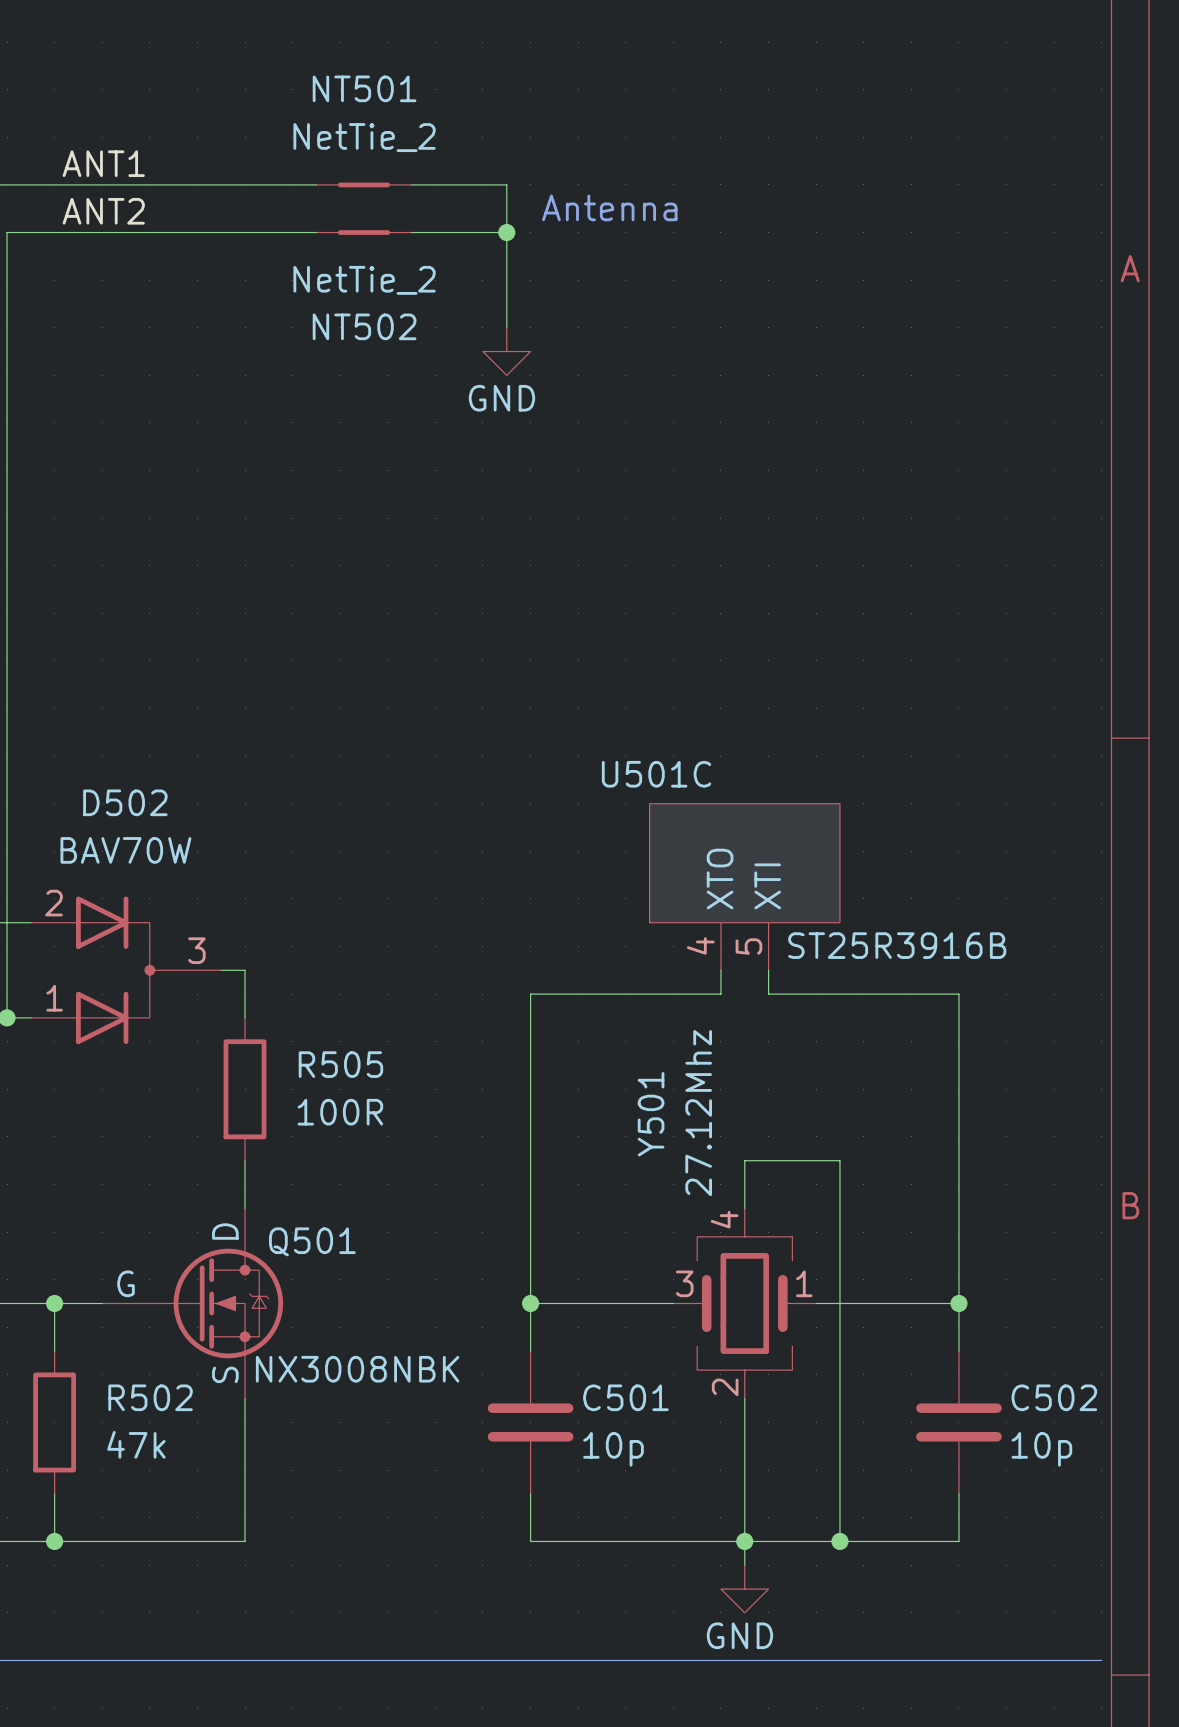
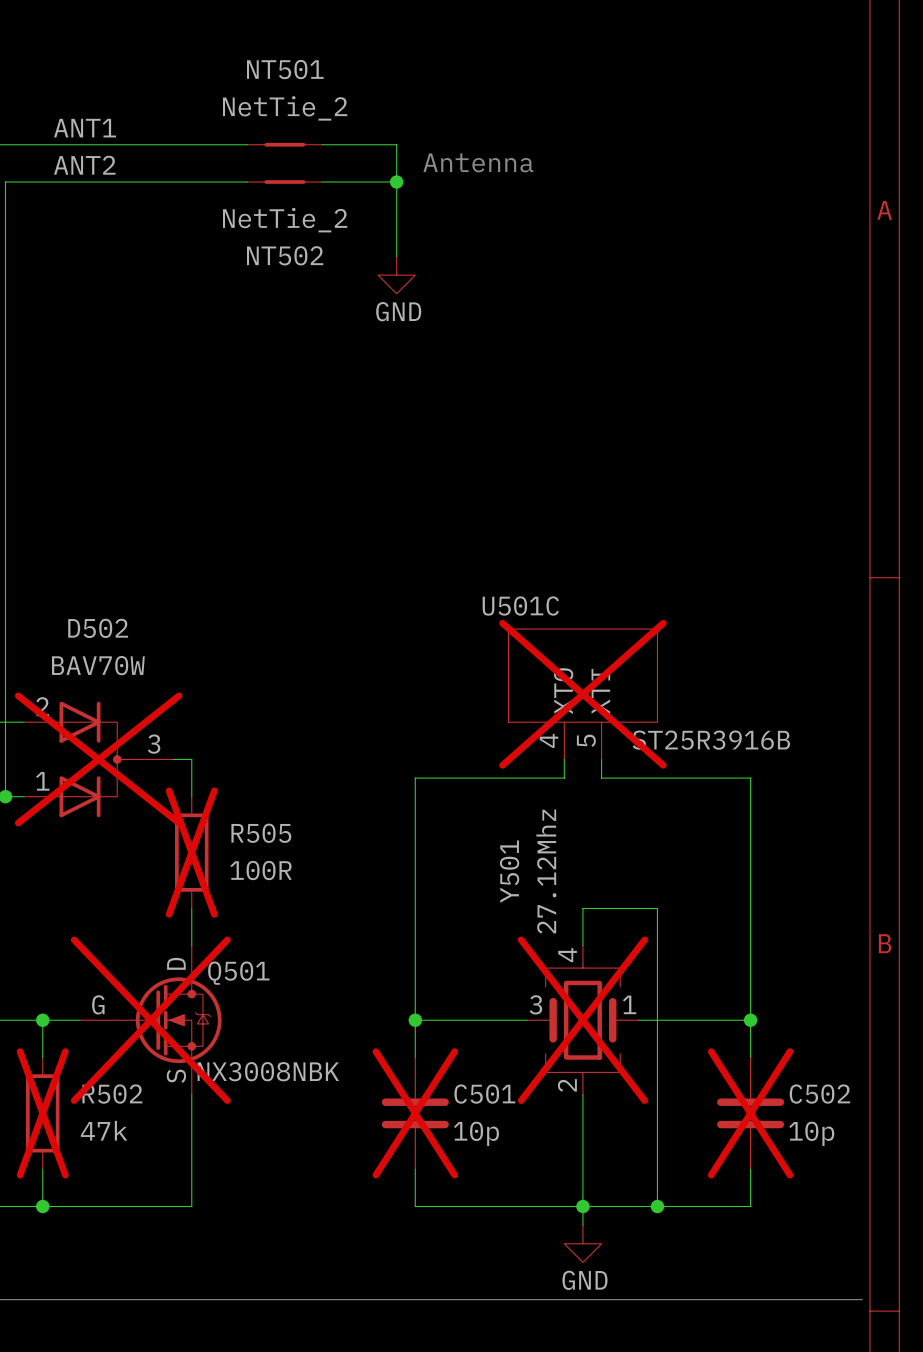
U501C do-not-place cross: none -> (582, 694)
D502 do-not-place cross: none -> (98, 759)
R505 do-not-place cross: none -> (191, 852)
Q501 do-not-place cross: none -> (150, 1020)
Y501 do-not-place cross: none -> (582, 1020)
R502 do-not-place cross: none -> (42, 1113)
C501 do-not-place cross: none -> (415, 1113)
C502 do-not-place cross: none -> (750, 1113)

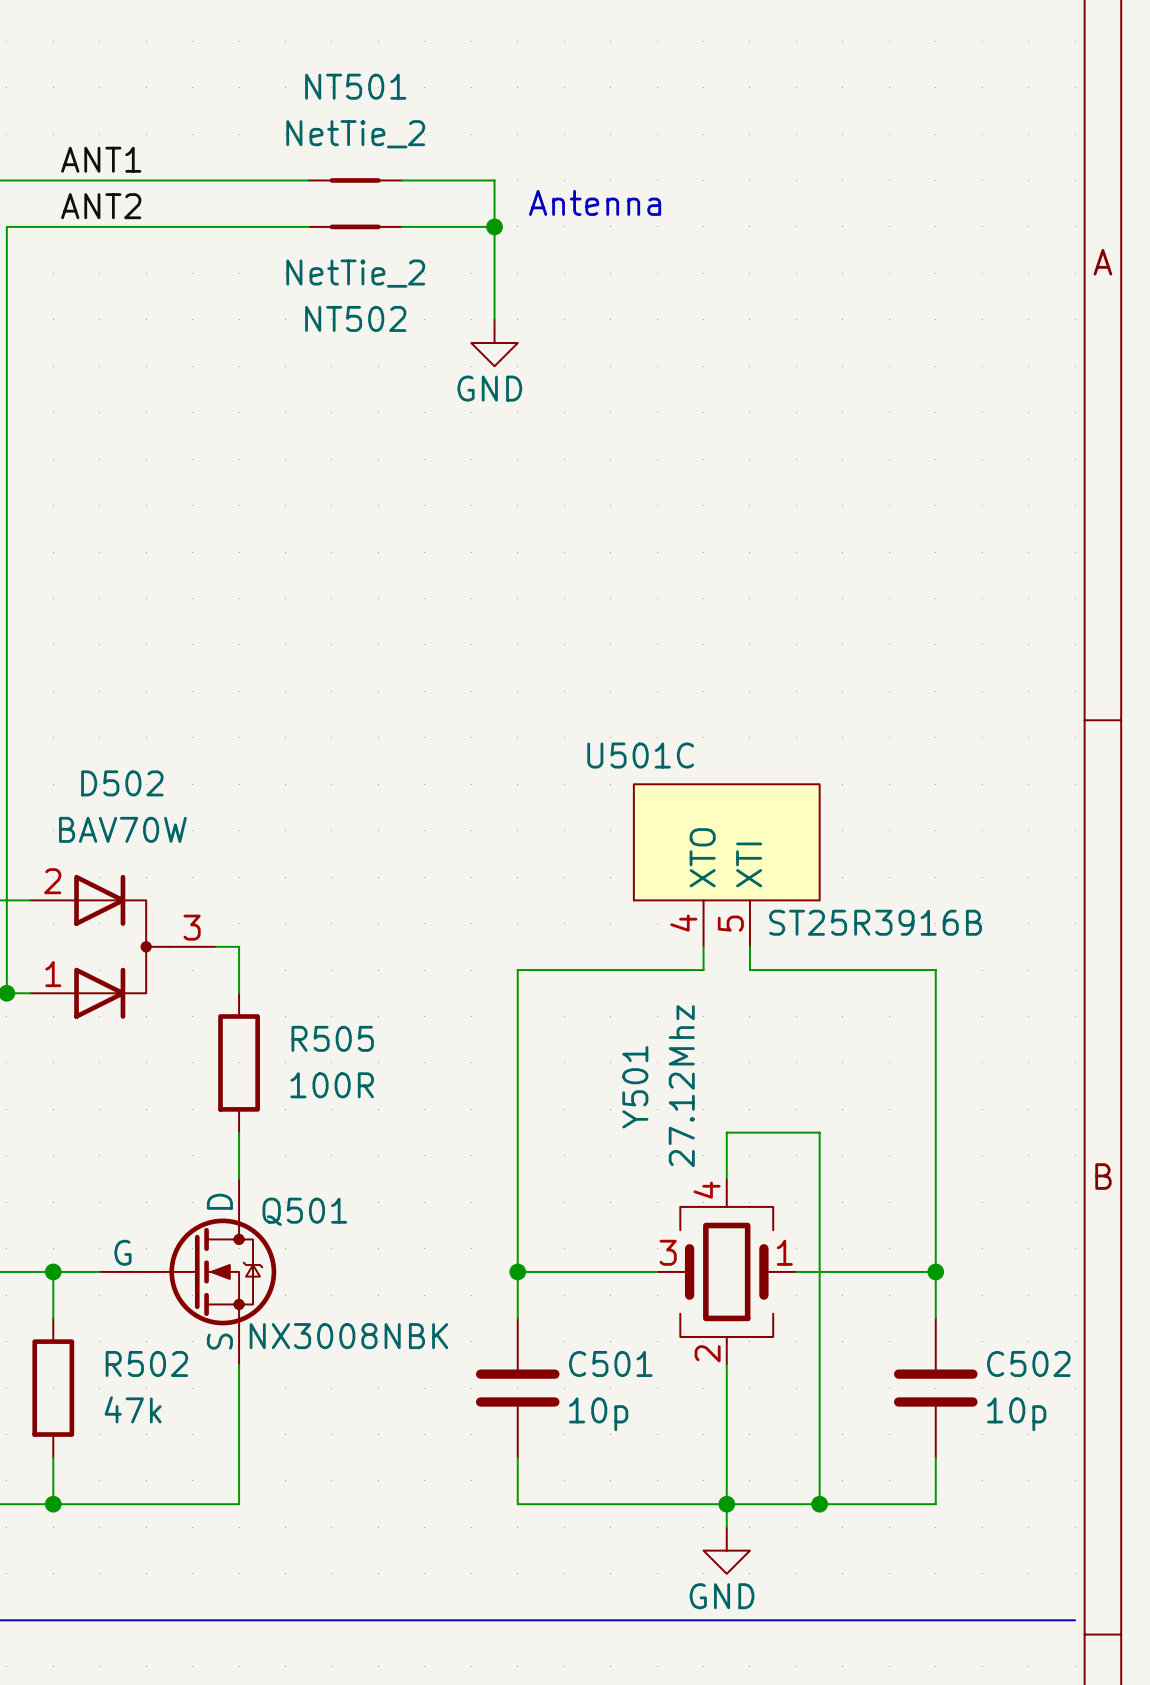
U501C do-not-place cross: (582, 694) -> none
D502 do-not-place cross: (98, 759) -> none
R505 do-not-place cross: (191, 852) -> none
Q501 do-not-place cross: (150, 1020) -> none
Y501 do-not-place cross: (582, 1020) -> none
R502 do-not-place cross: (42, 1113) -> none
C501 do-not-place cross: (415, 1113) -> none
C502 do-not-place cross: (750, 1113) -> none

